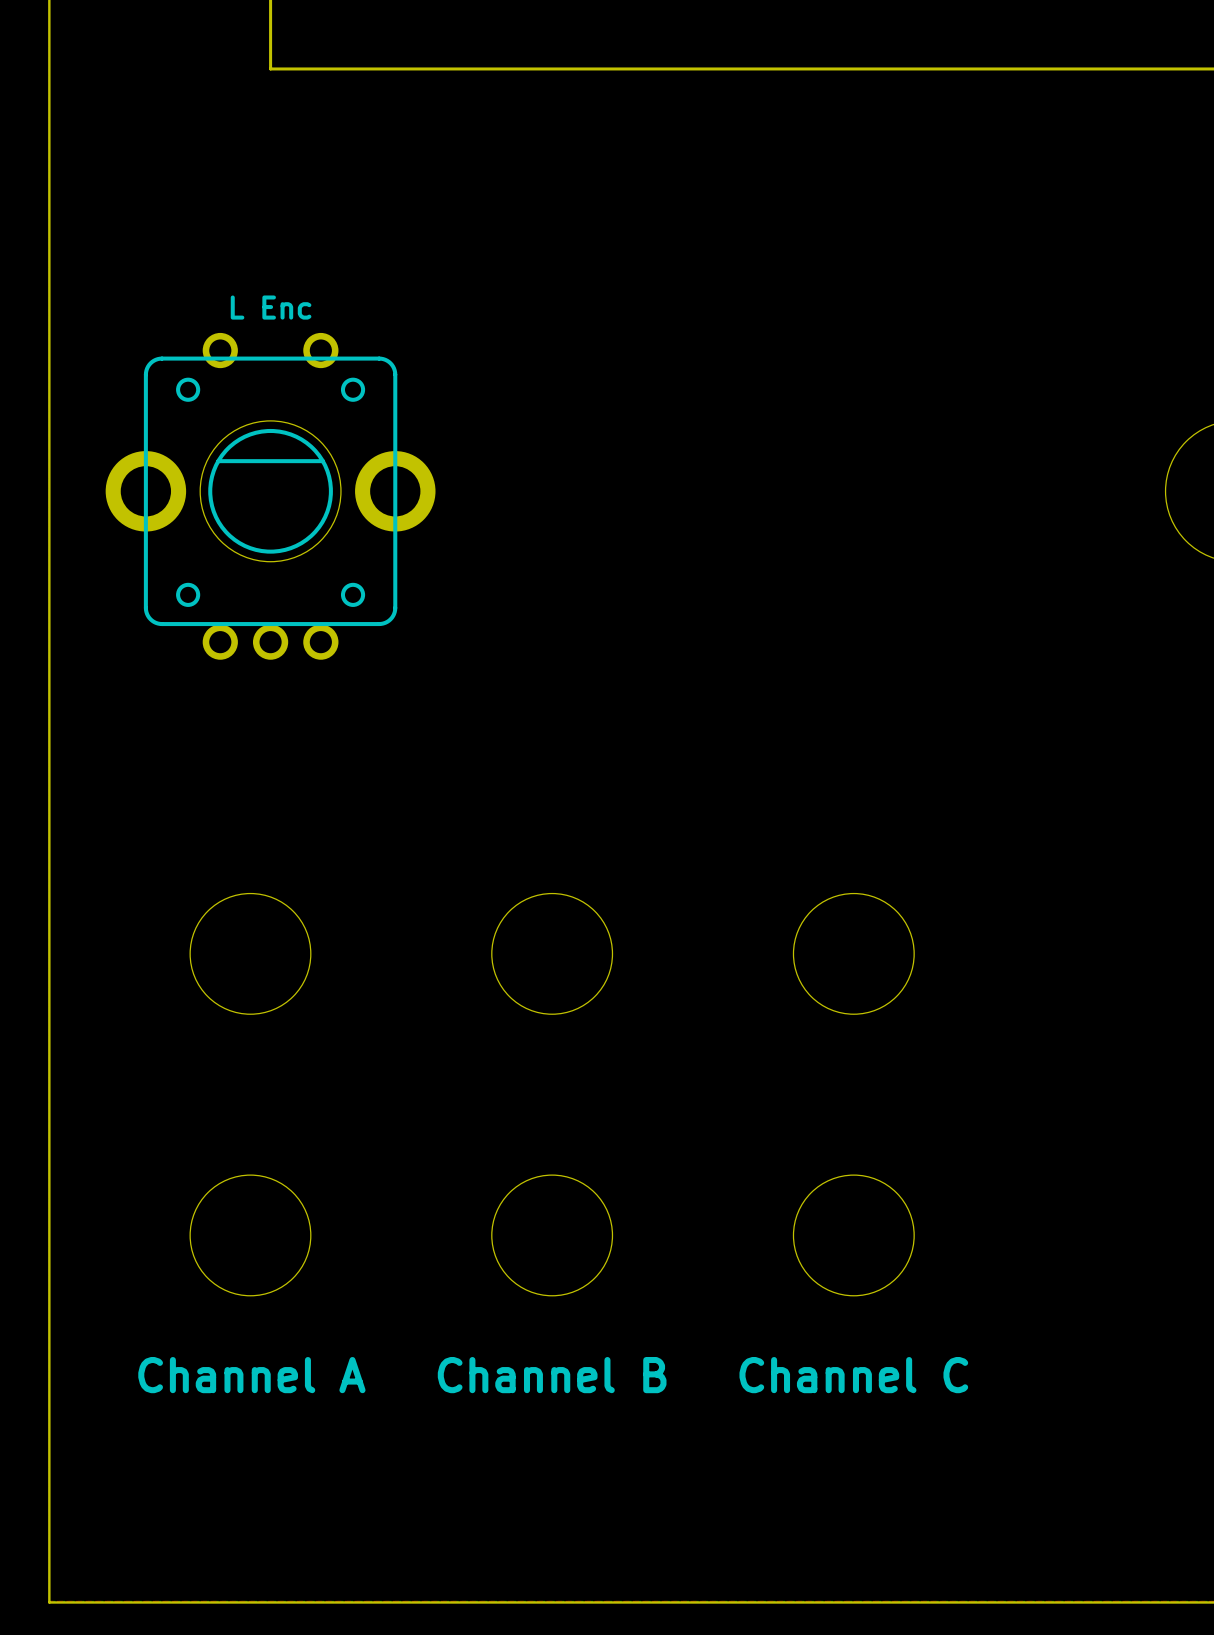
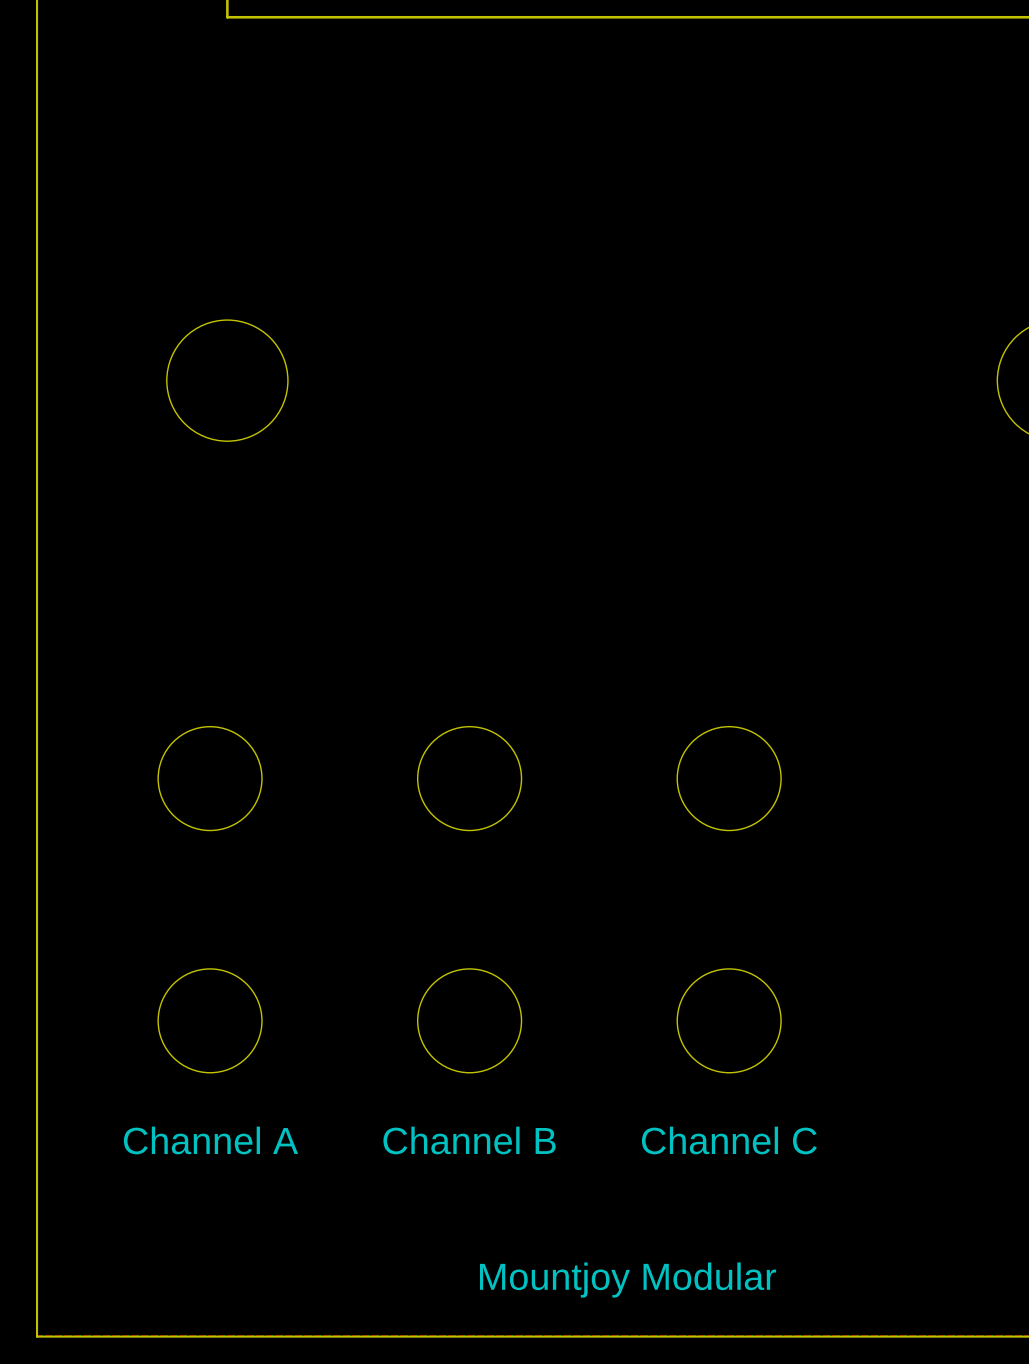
L Enc: (270, 496) -> none
text: none -> Mountjoy Modular (628, 1280)

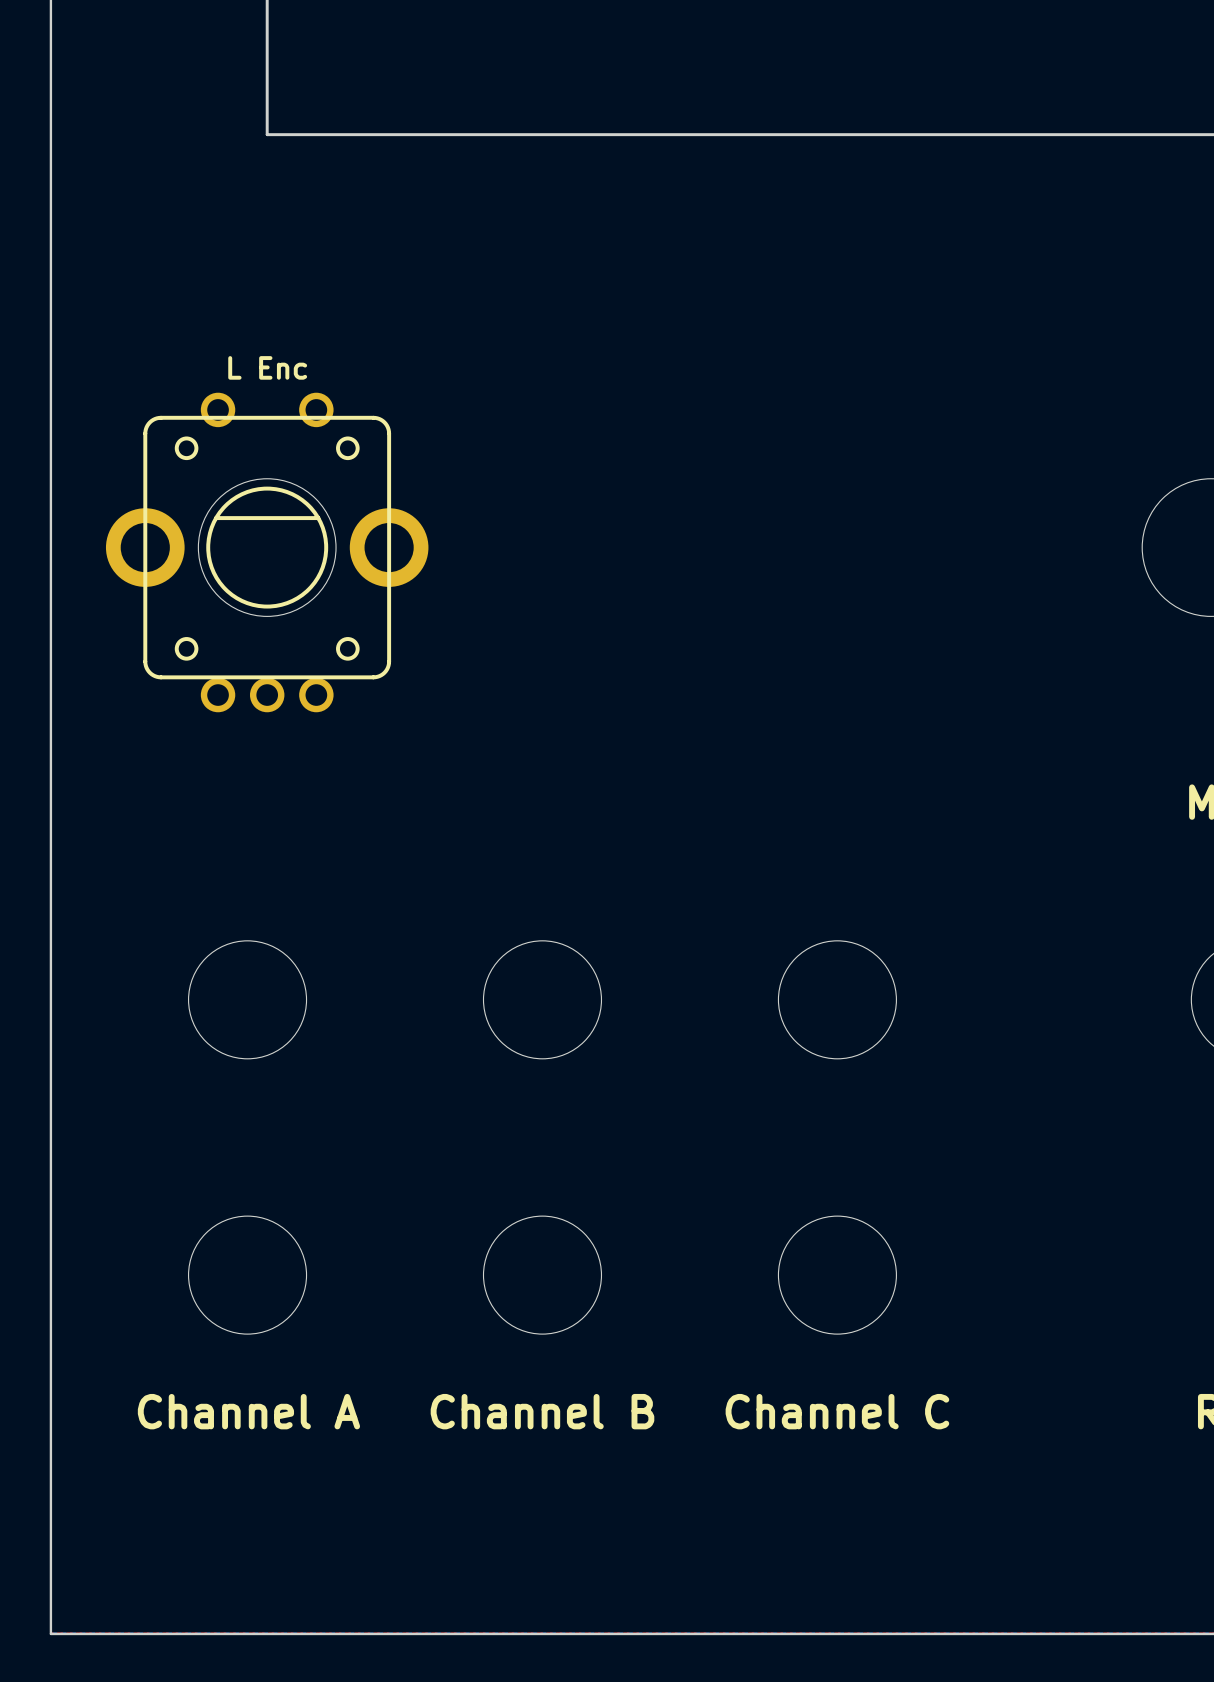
L Enc: none -> (267, 552)
text: Mountjoy Modular (628, 1280) -> none

